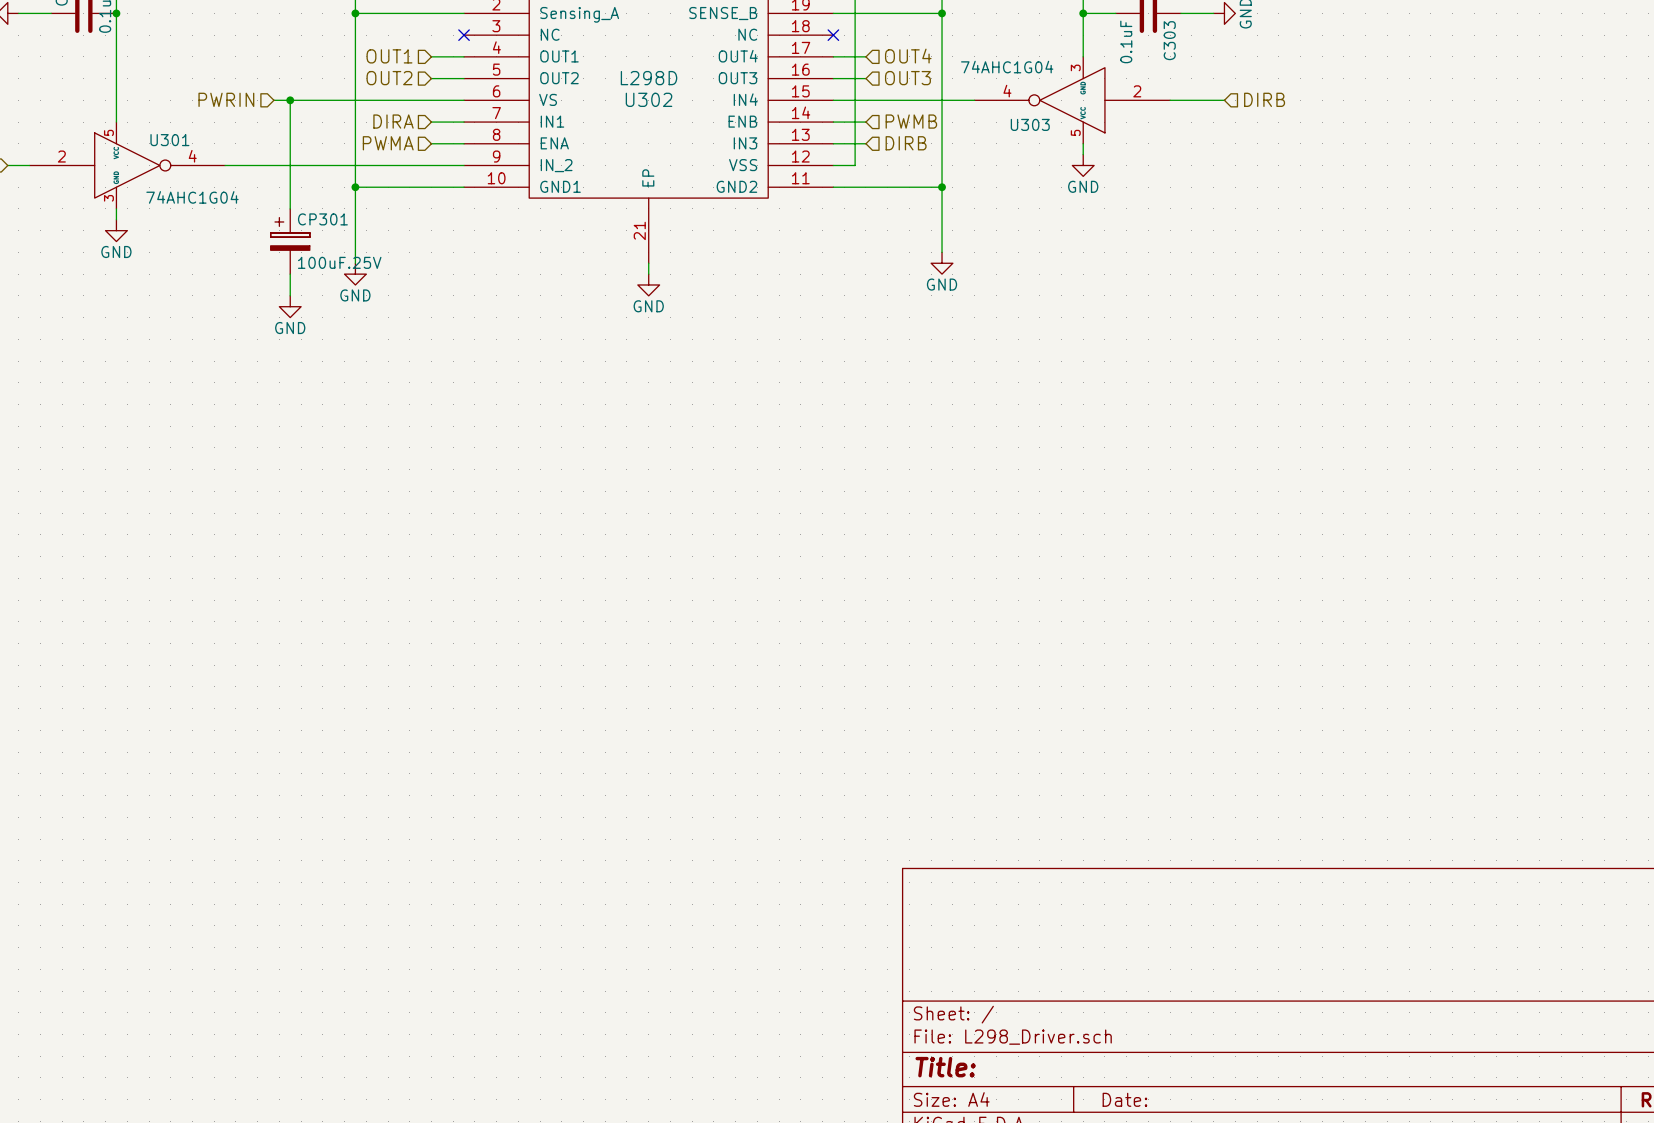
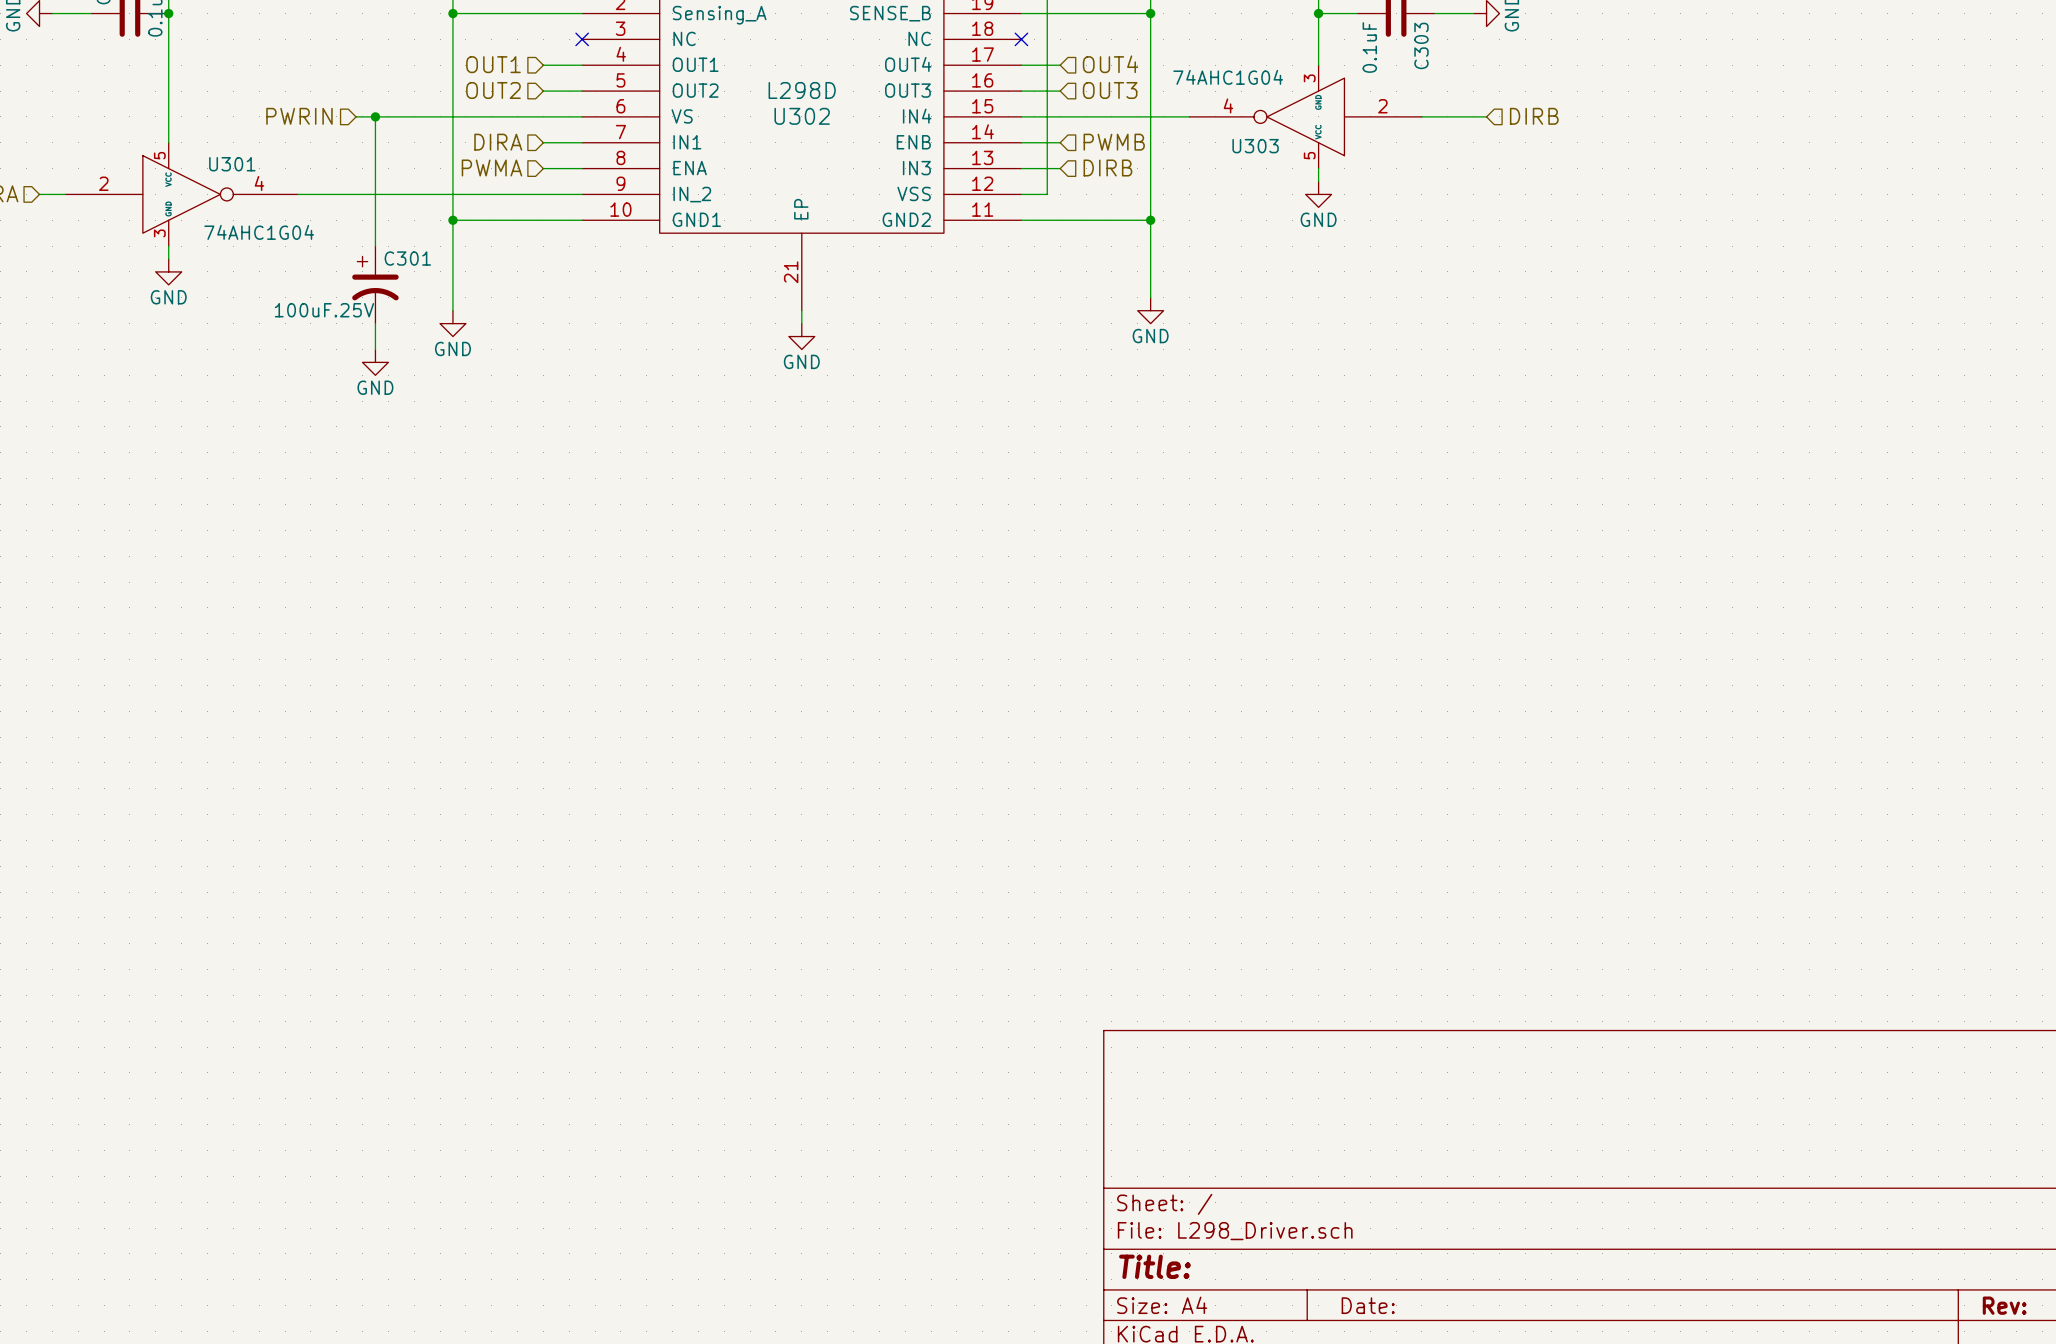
CP301: 100uF.25V (290, 241) -> none
C301: none -> 100uF.25V (375, 284)

